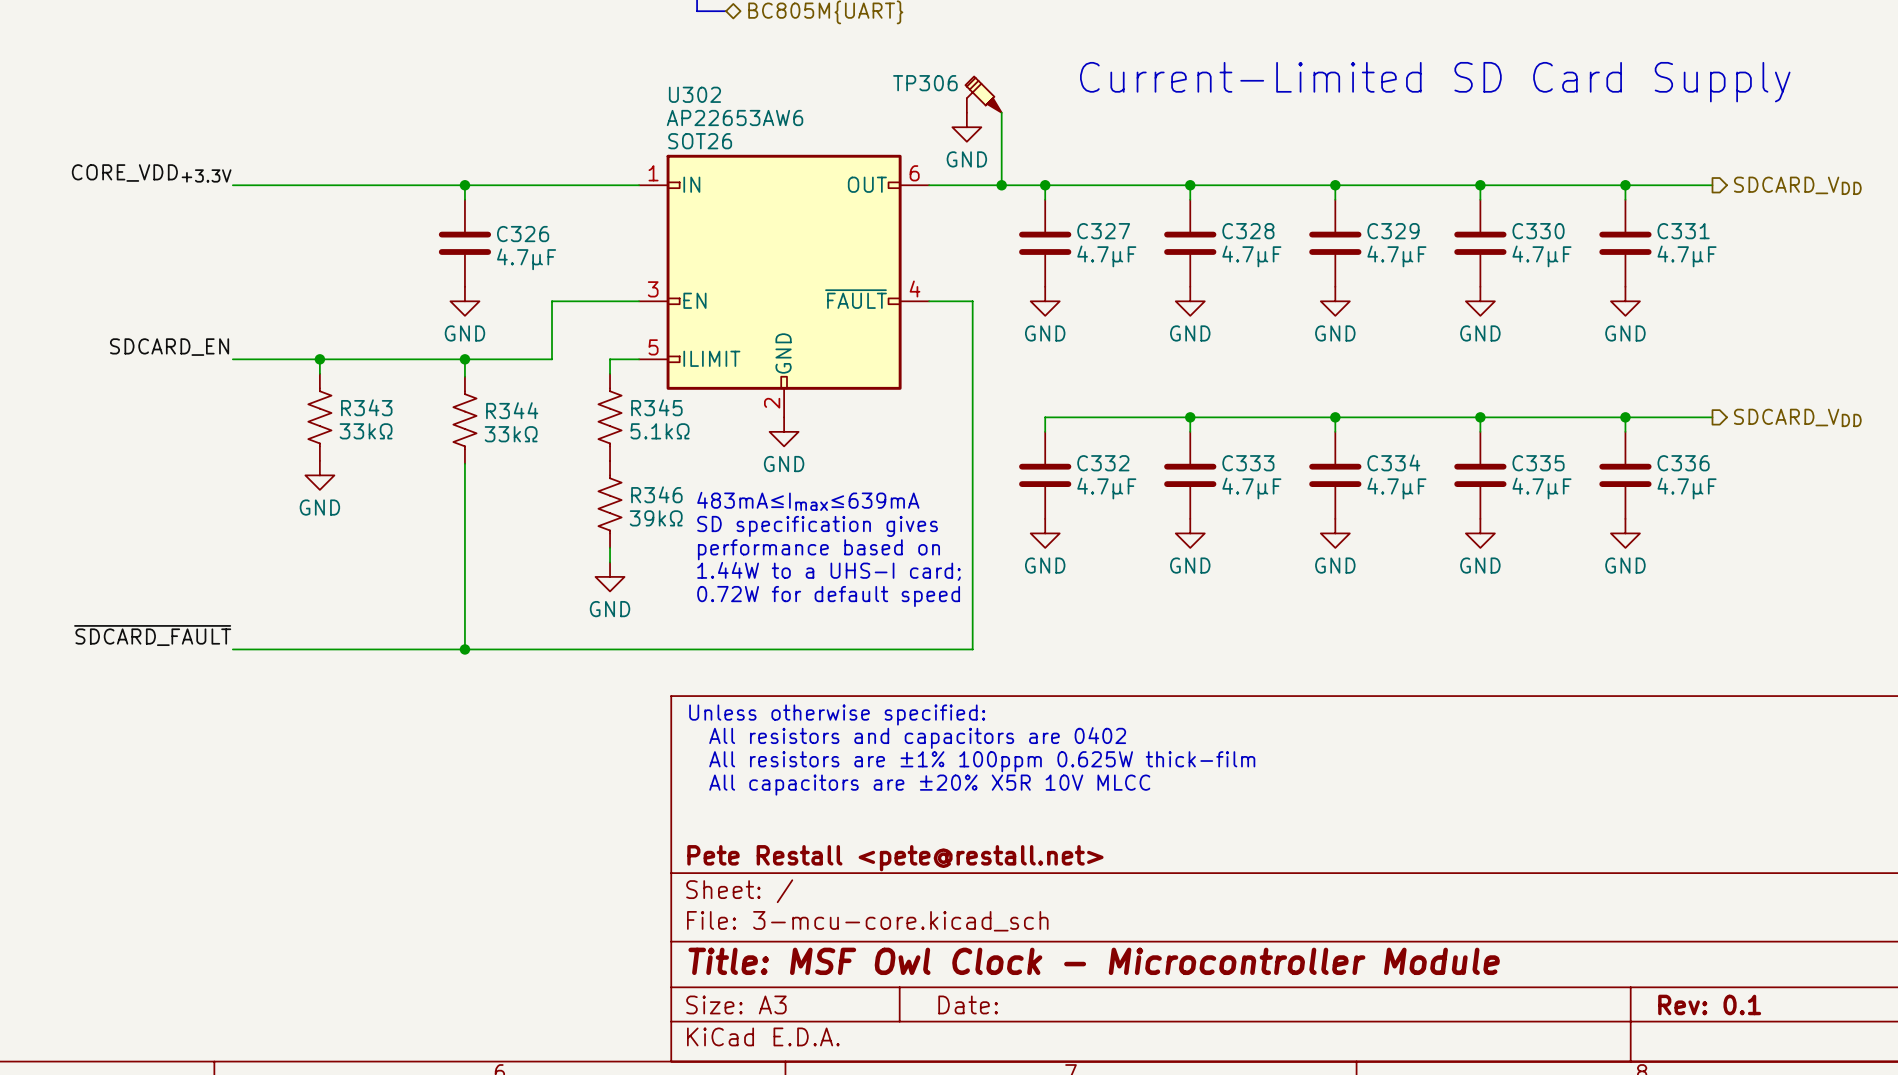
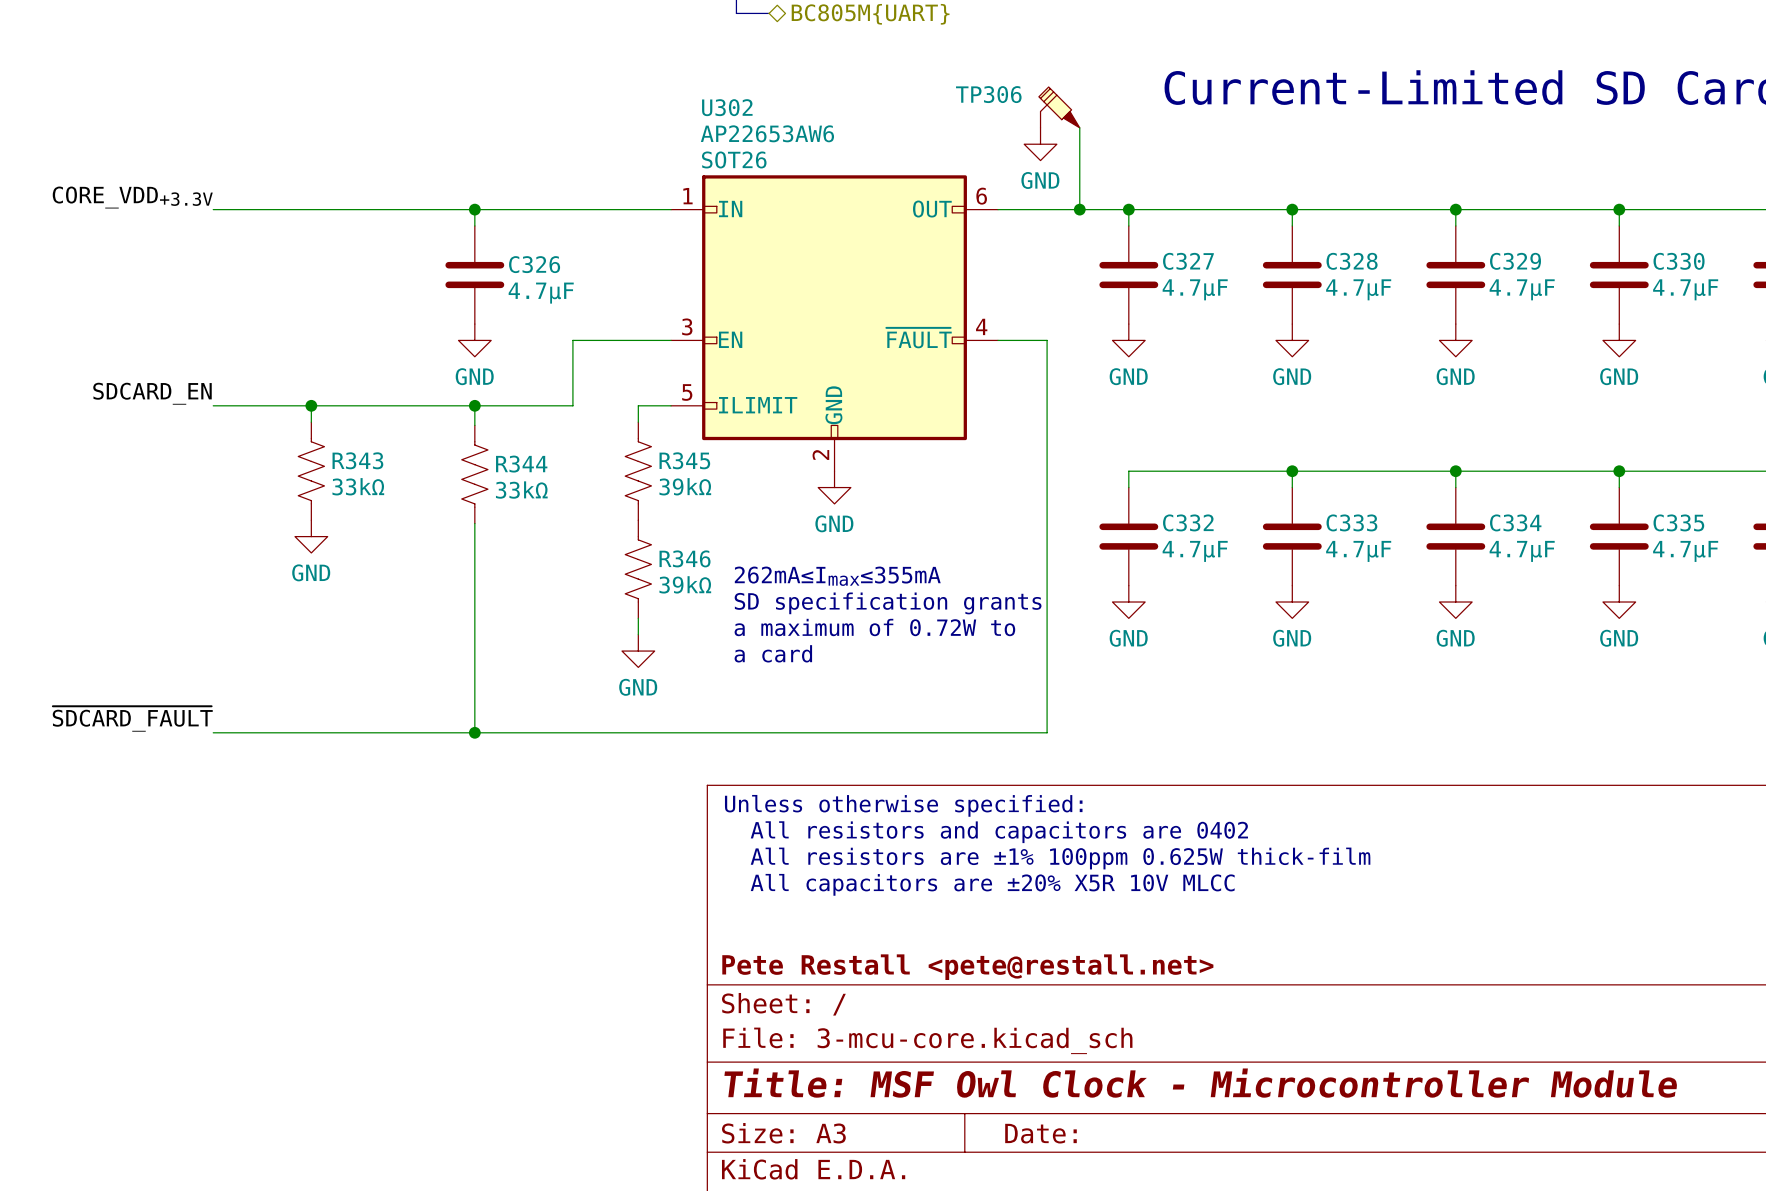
R345 value: 5.1kΩ (660, 431) -> 39kΩ (685, 486)
text: 483mA≤Imax≤639mA (808, 501) -> 262mA≤Imax≤355mA (837, 576)
text: SD specification gives (817, 526) -> SD specification grants (888, 603)
text: performance based on (818, 549) -> none
text: none -> a maximum of 0.72W to (874, 627)
text: 1.44W to a UHS-I card; (828, 571) -> none
text: none -> a card (773, 653)
text: 0.72W for default speed (828, 596) -> none

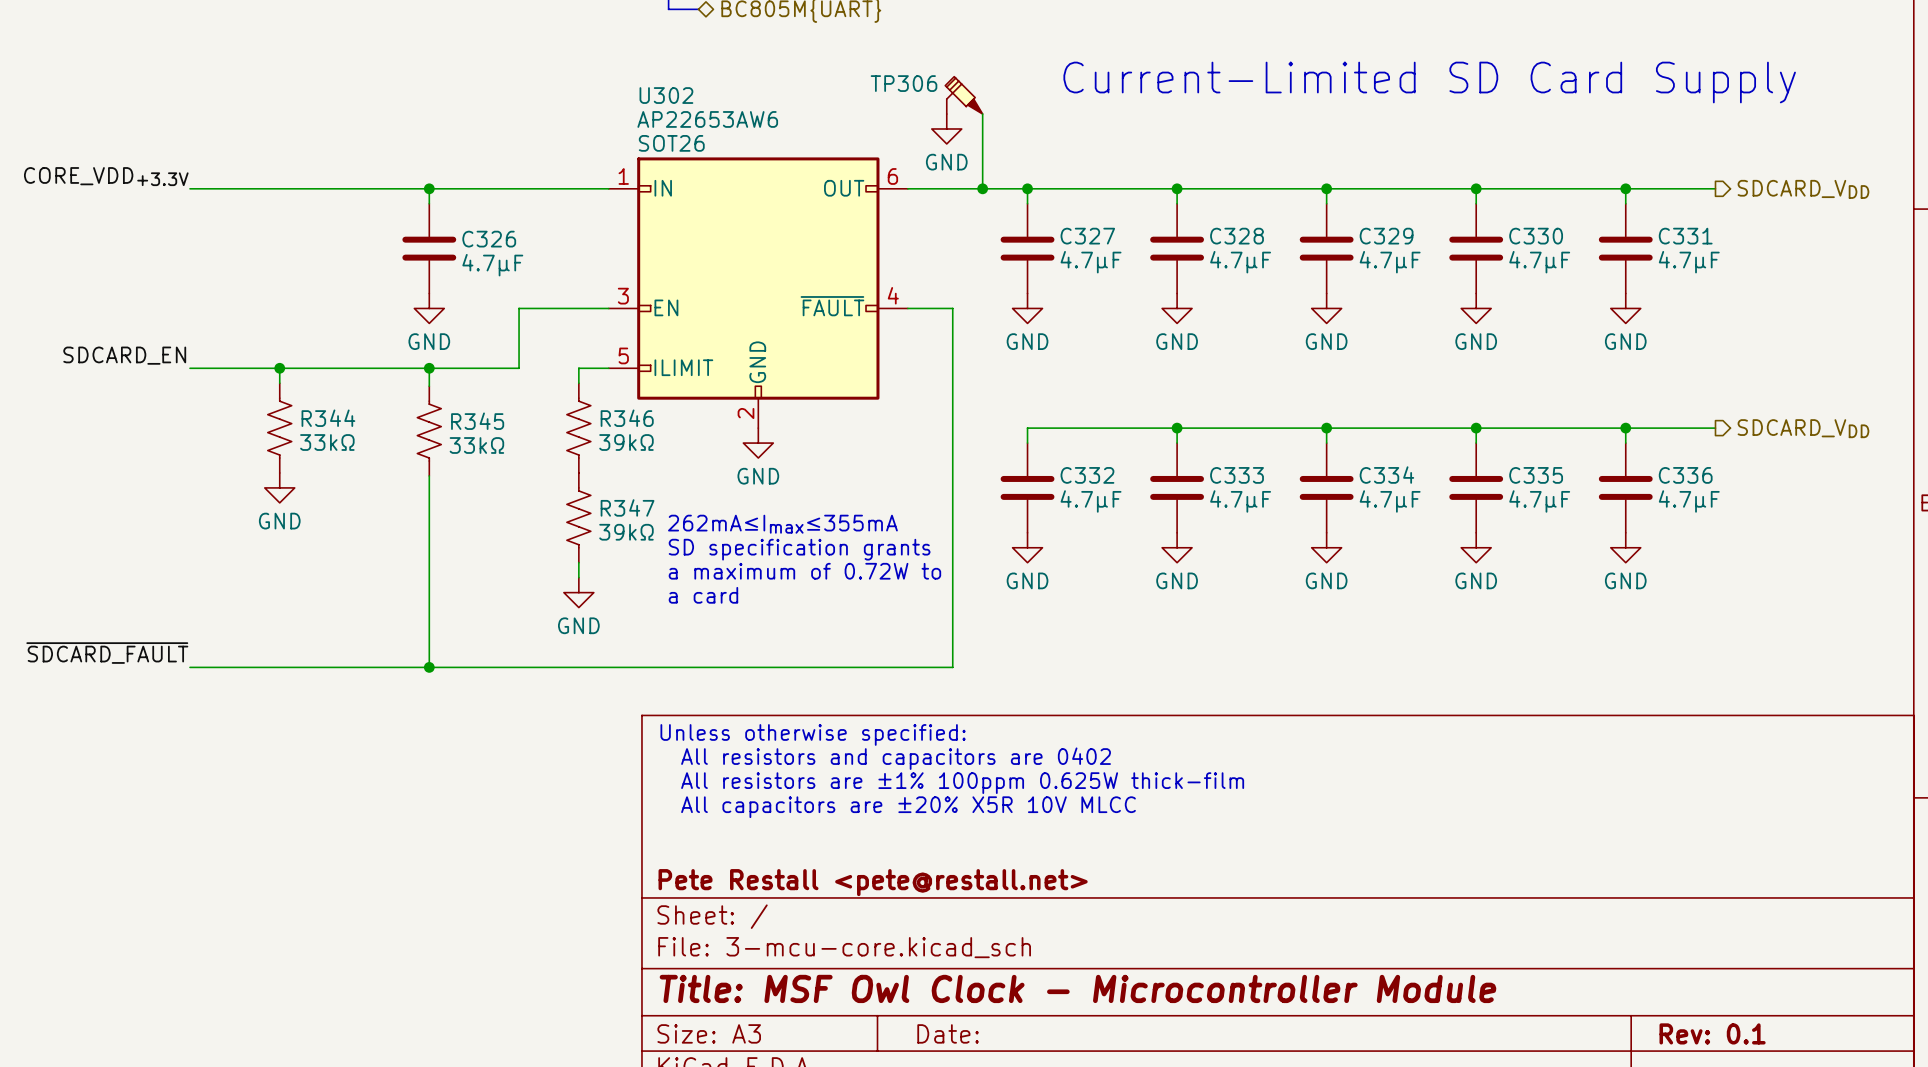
R343 name: R343 (357, 460) -> R344 (328, 418)
R345 name: R345 (684, 460) -> R346 (627, 418)
R344 name: R344 (521, 464) -> R345 (477, 421)
R346 name: R346 (685, 558) -> R347 (627, 507)

